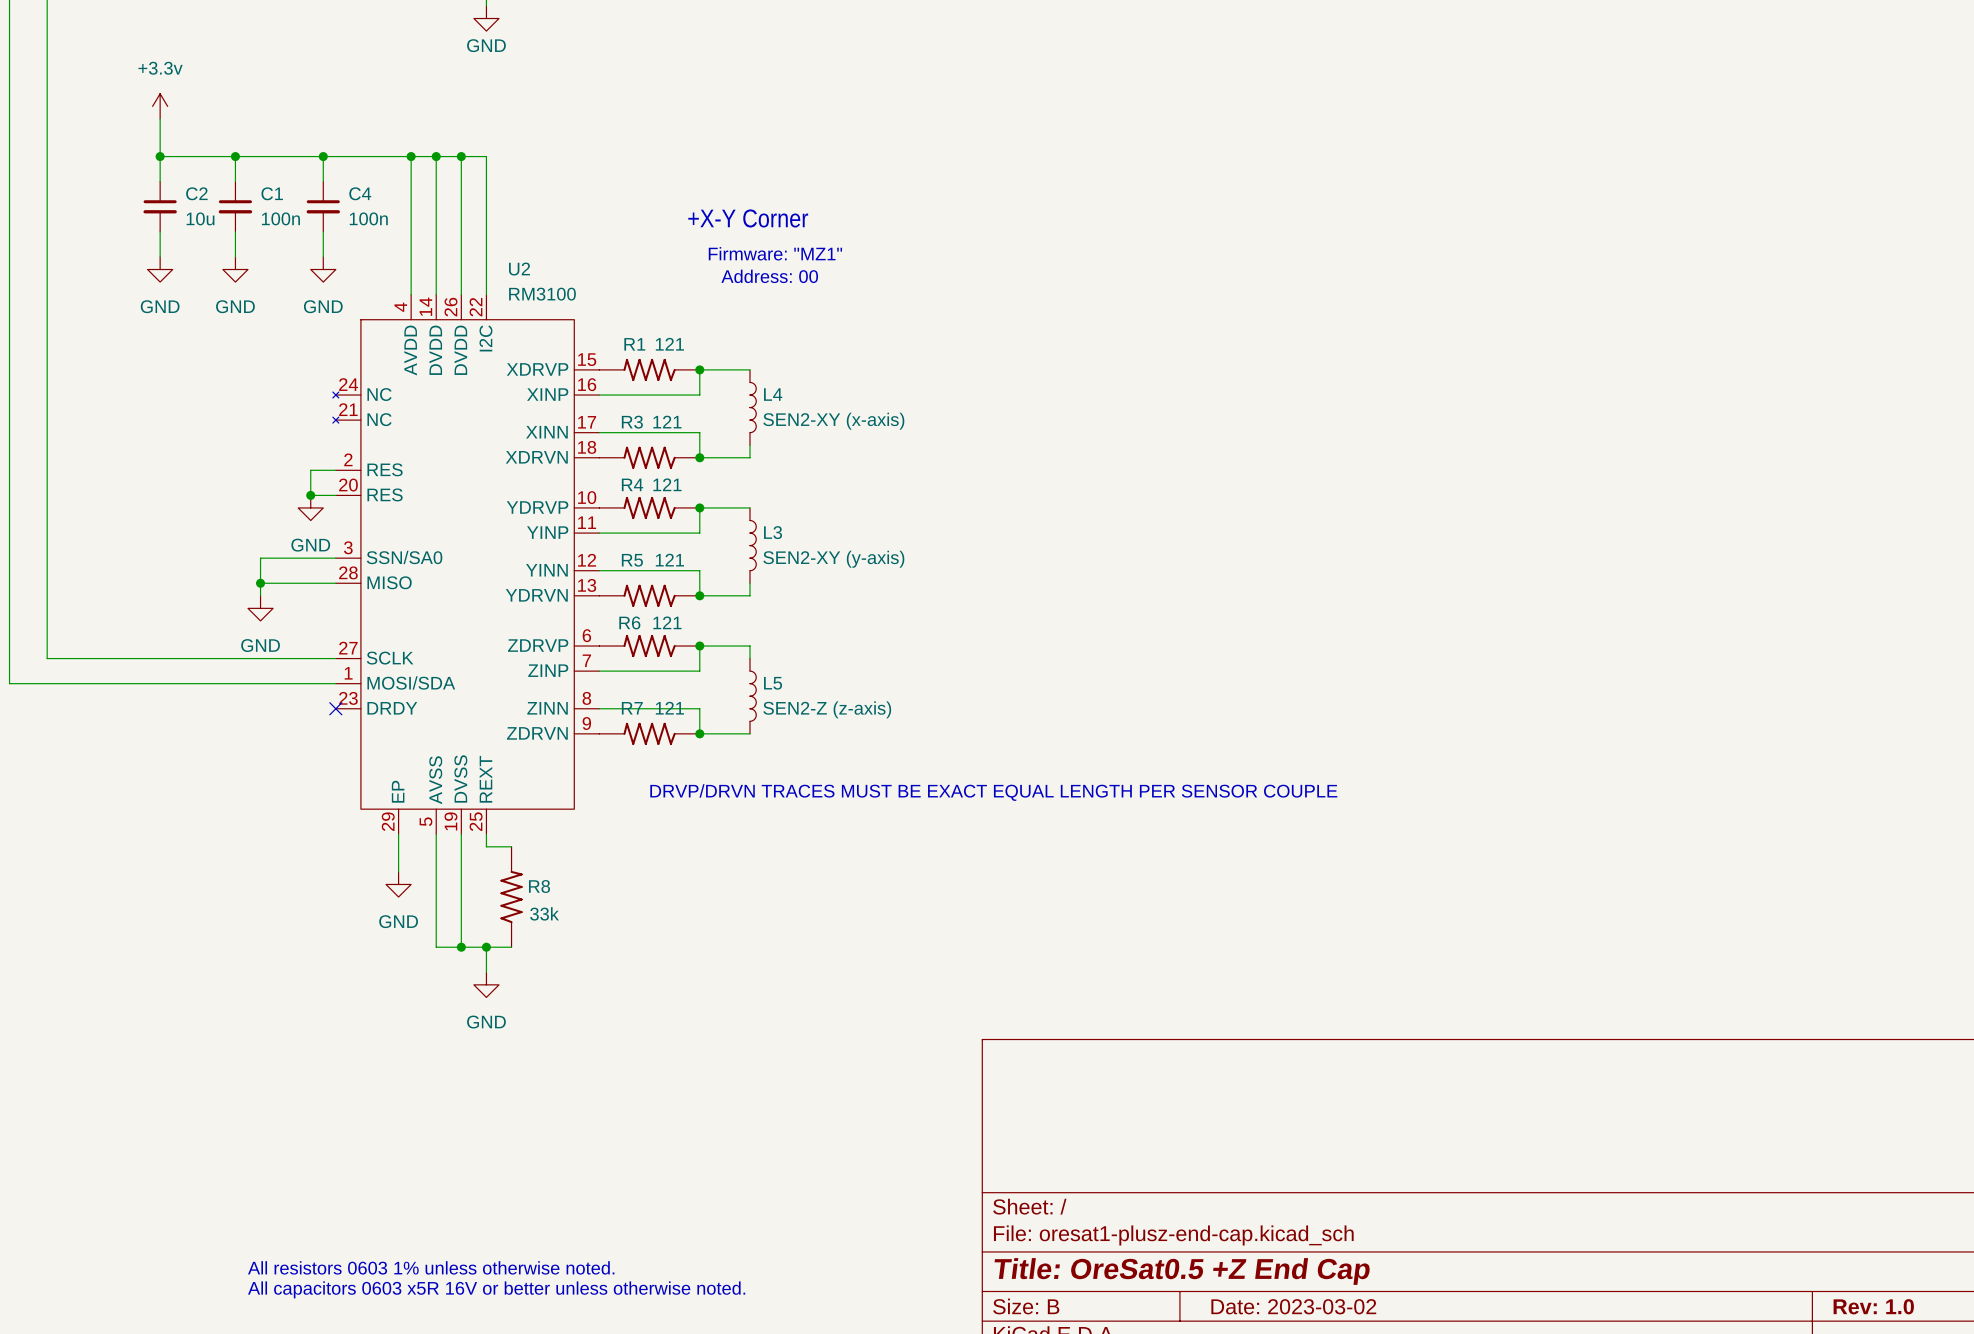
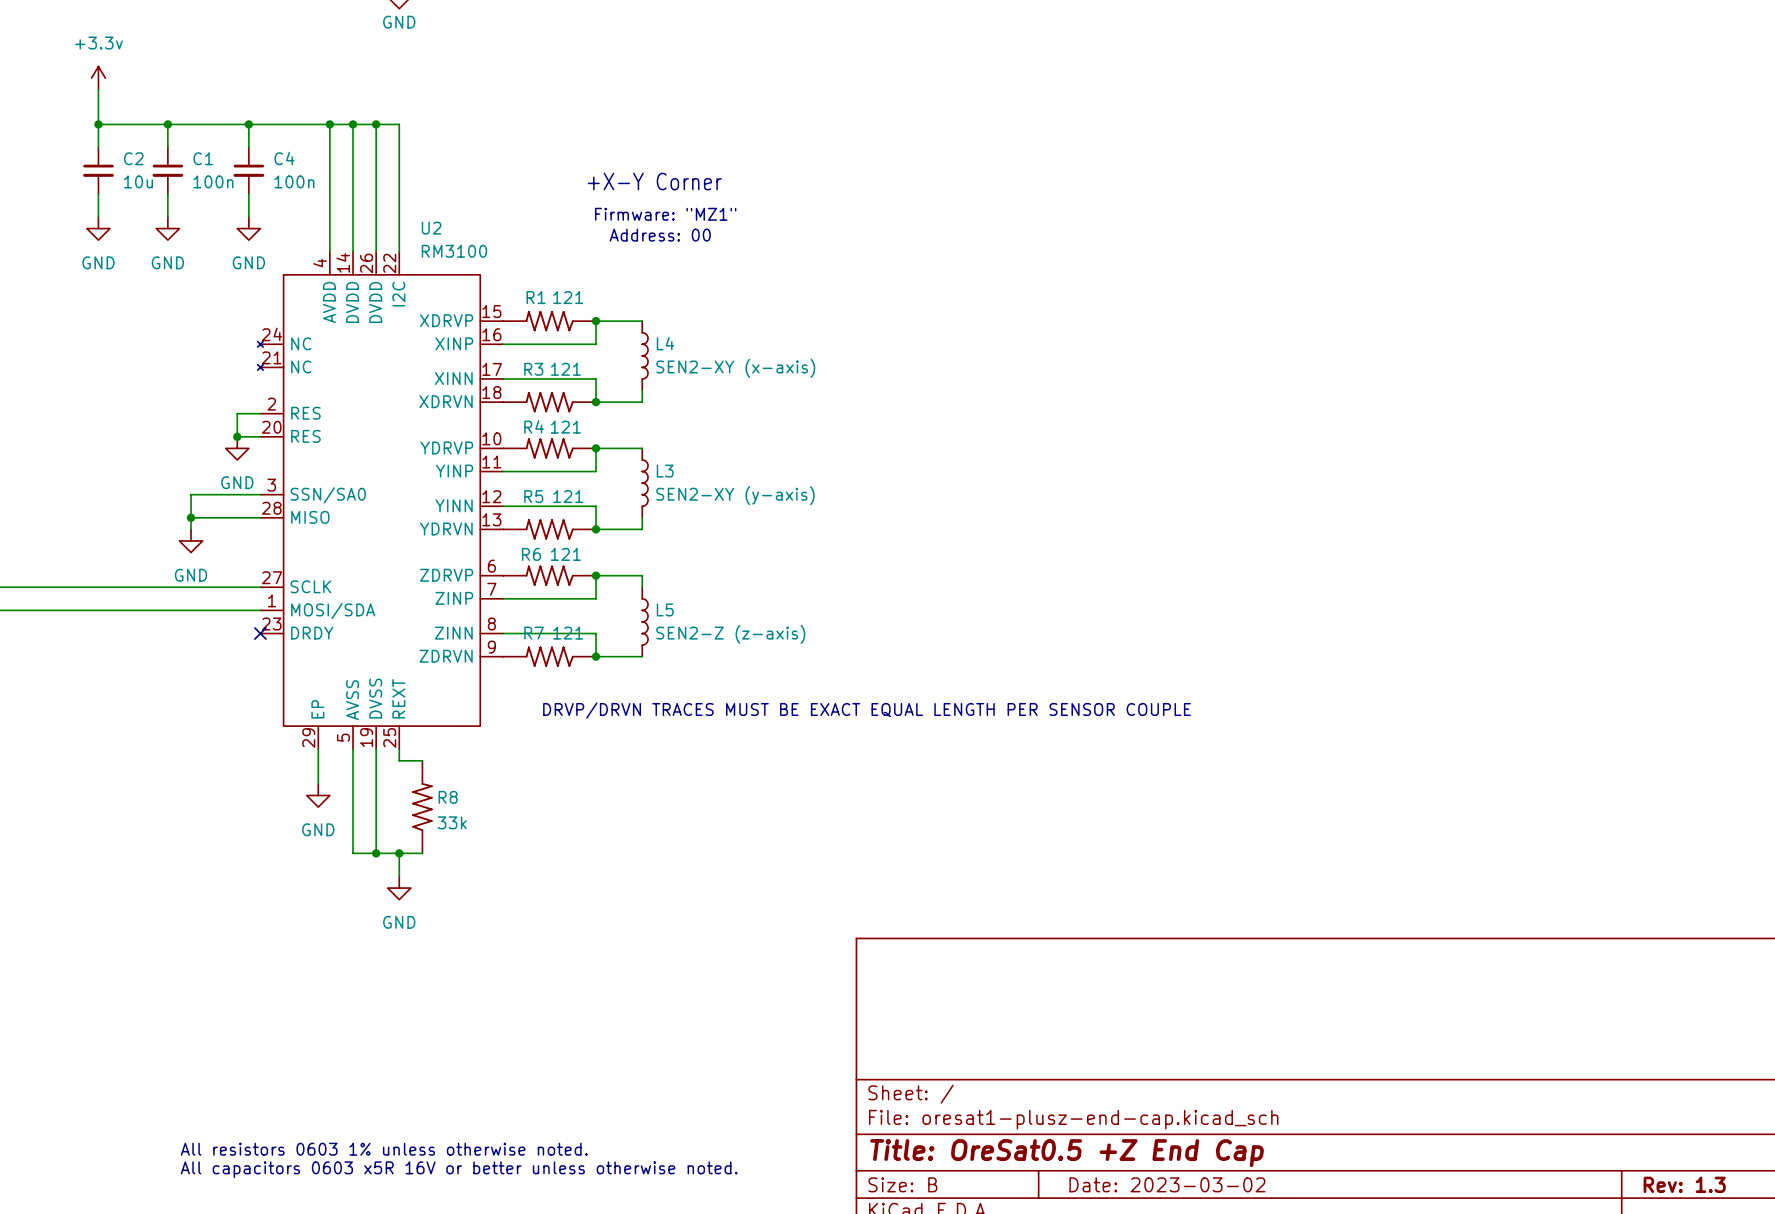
title block: Rev: 1.0 (1873, 1306) -> Rev: 1.3 (1684, 1184)

